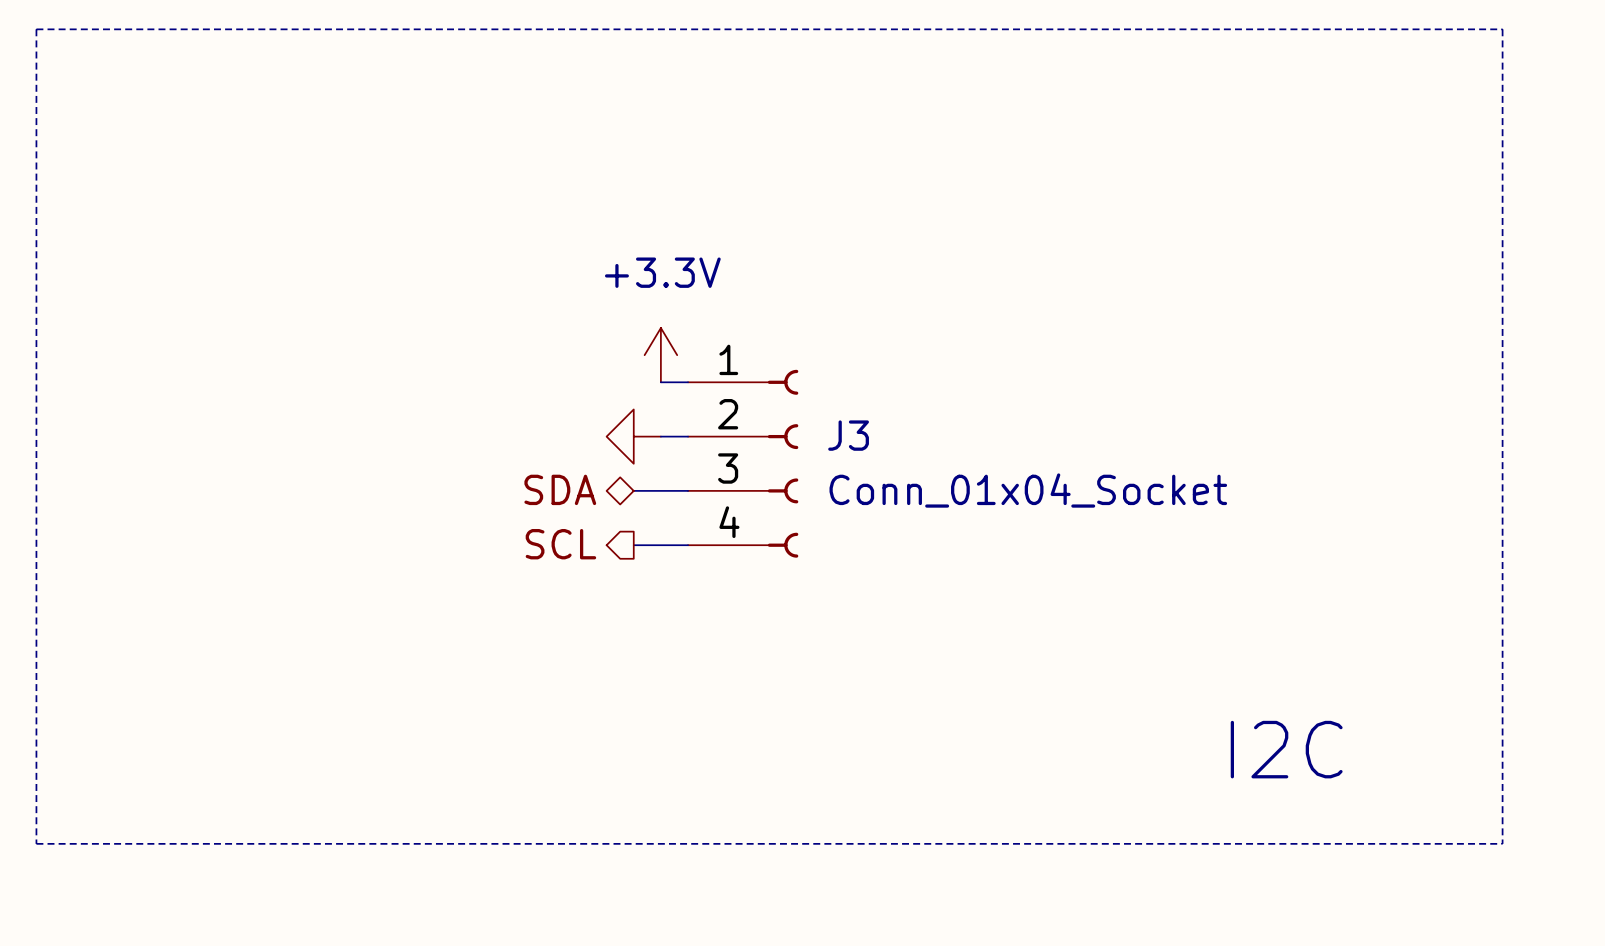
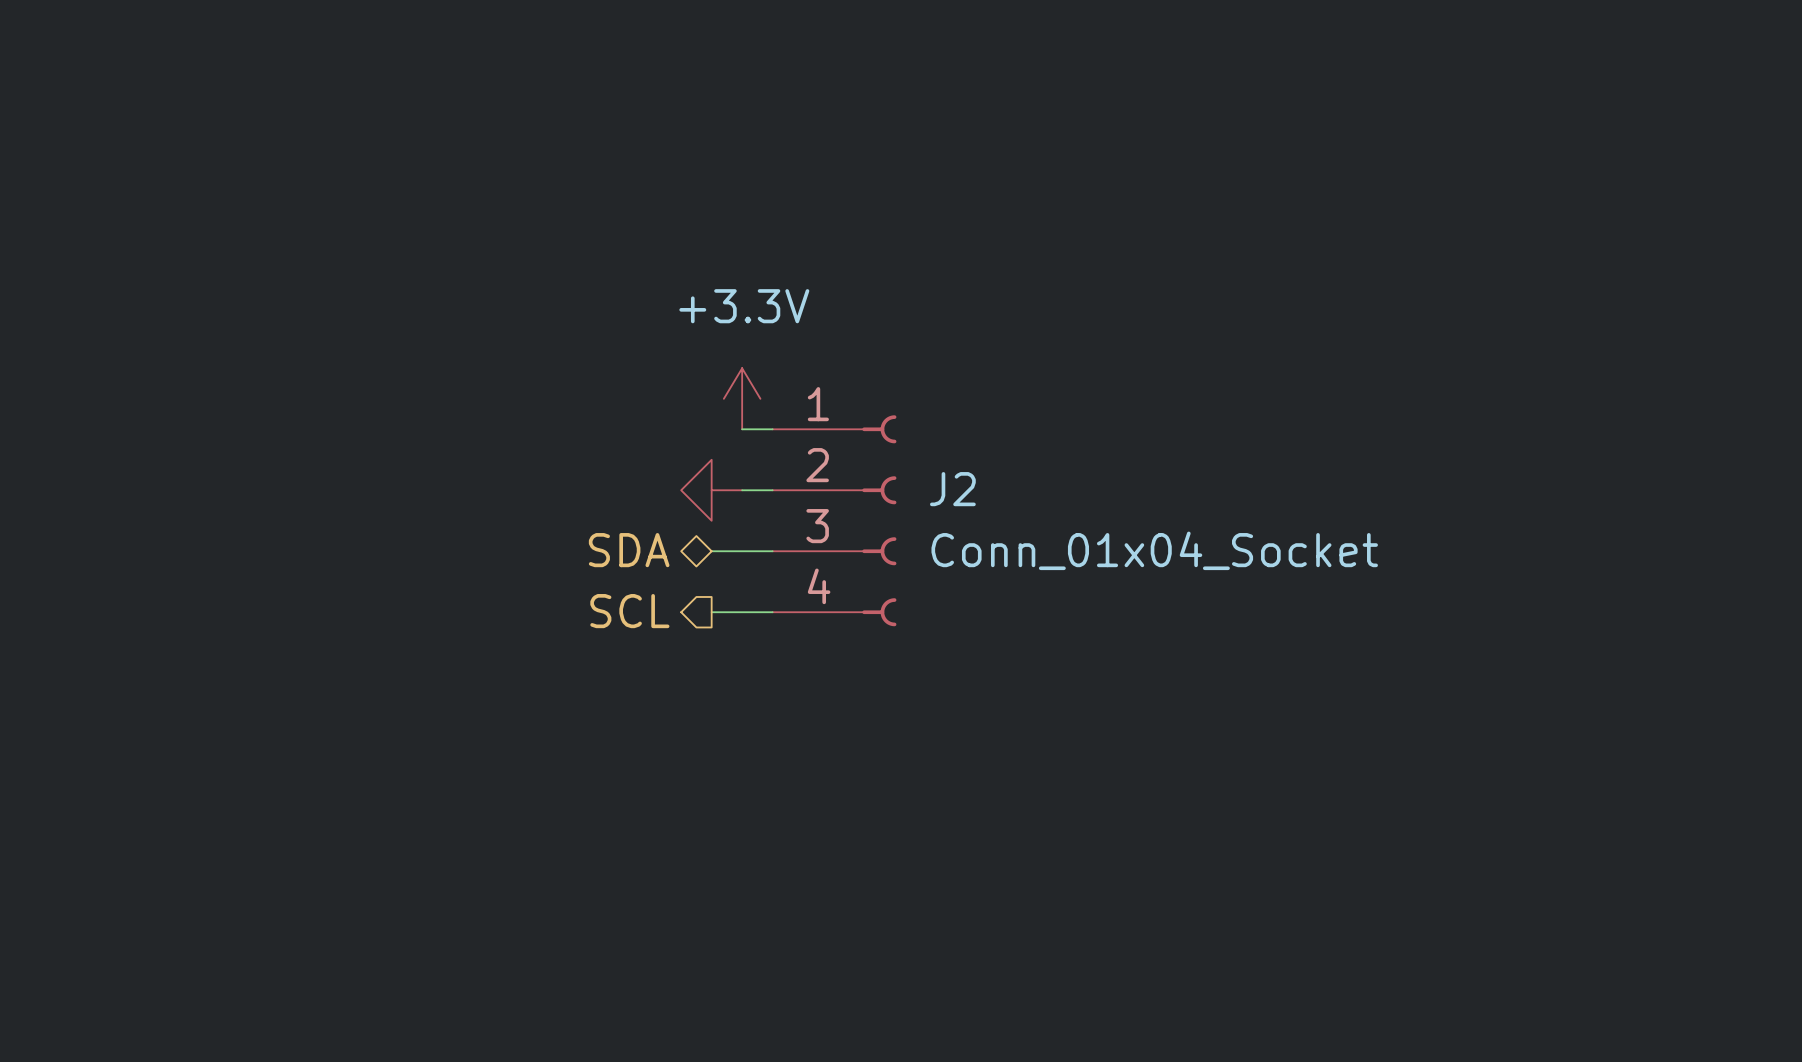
line: (36, 29) (36, 843) (1502, 843) (1502, 29) (36, 29) -> none
J3 name: J3 (848, 435) -> J2 (952, 489)
text: I2C (1286, 749) -> none

